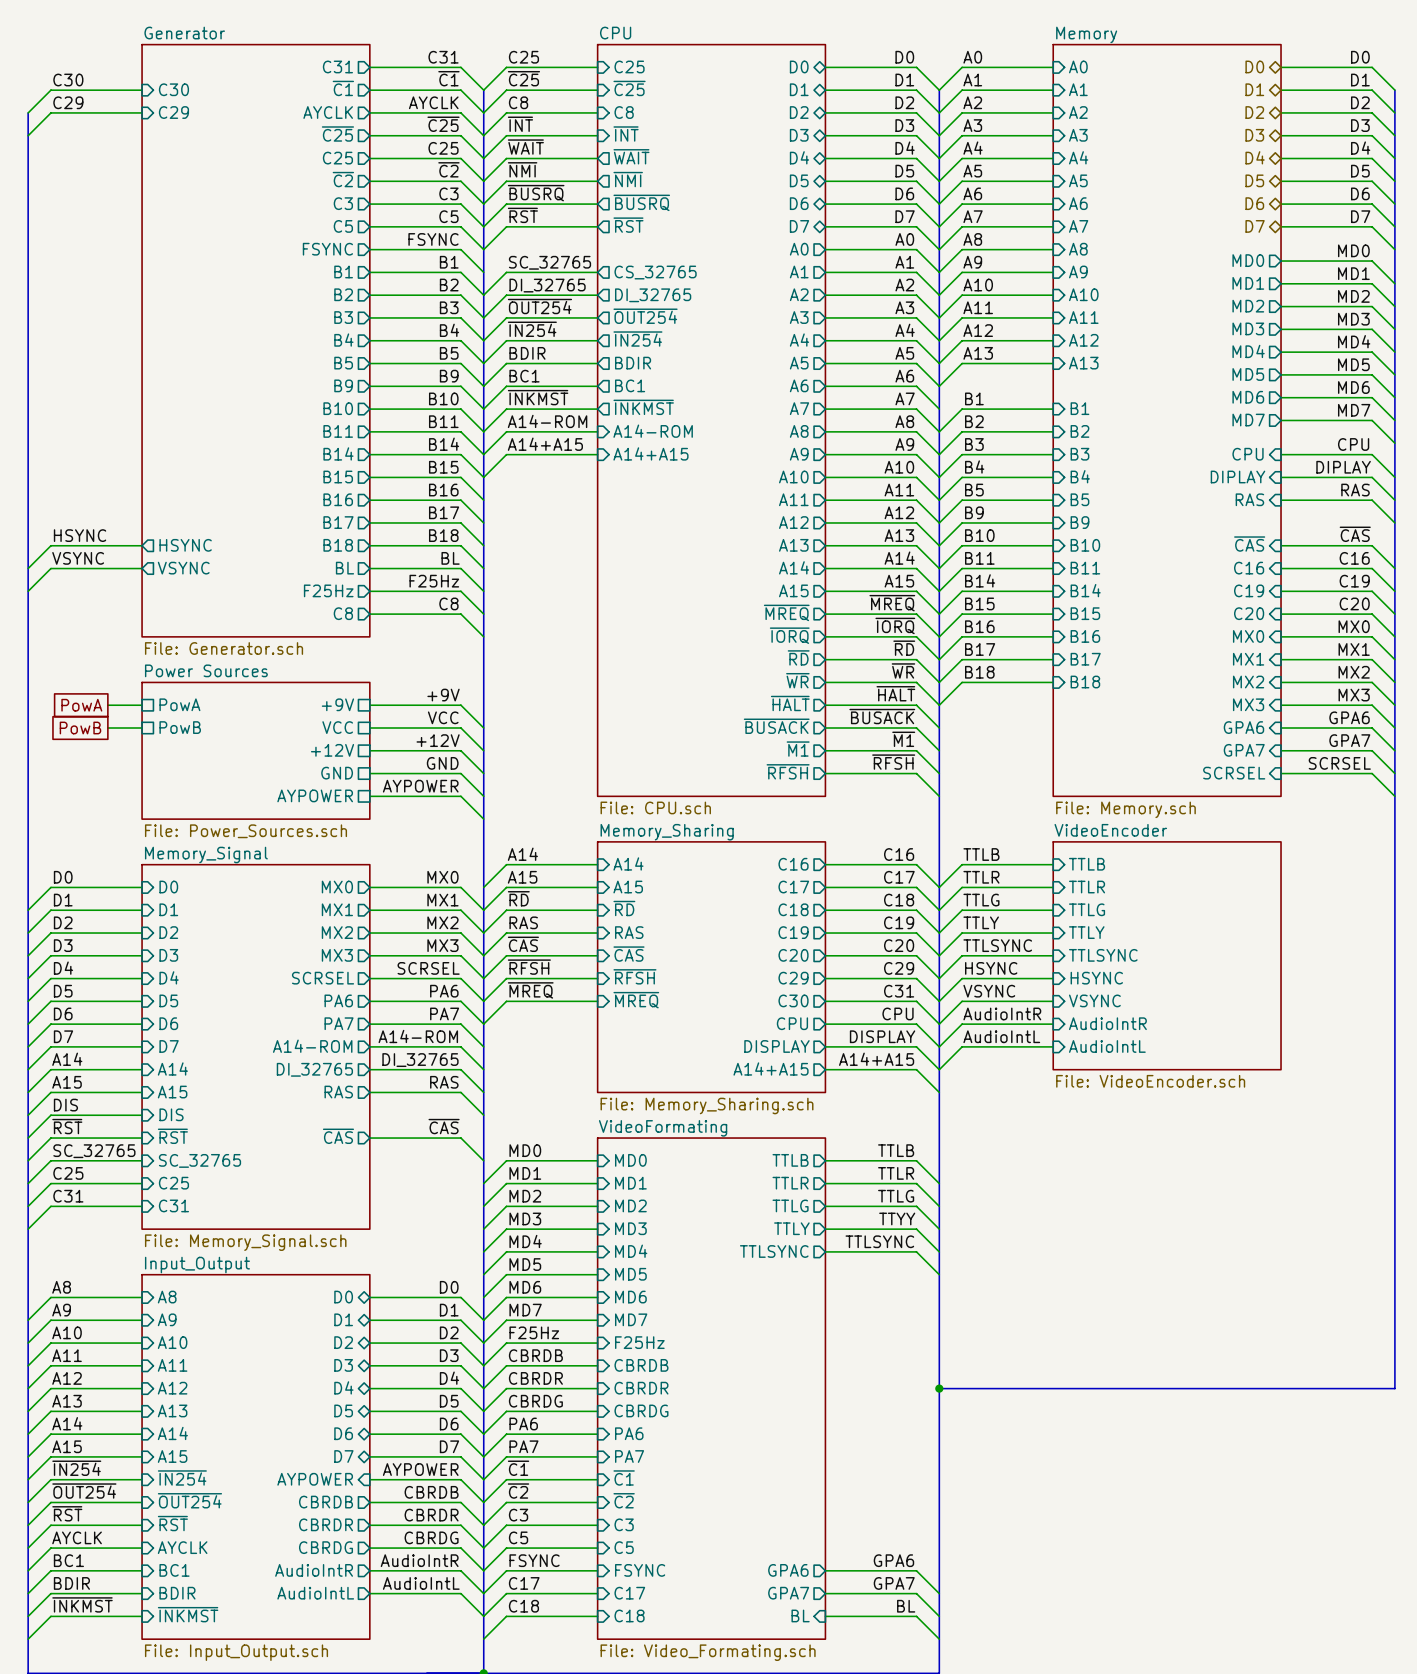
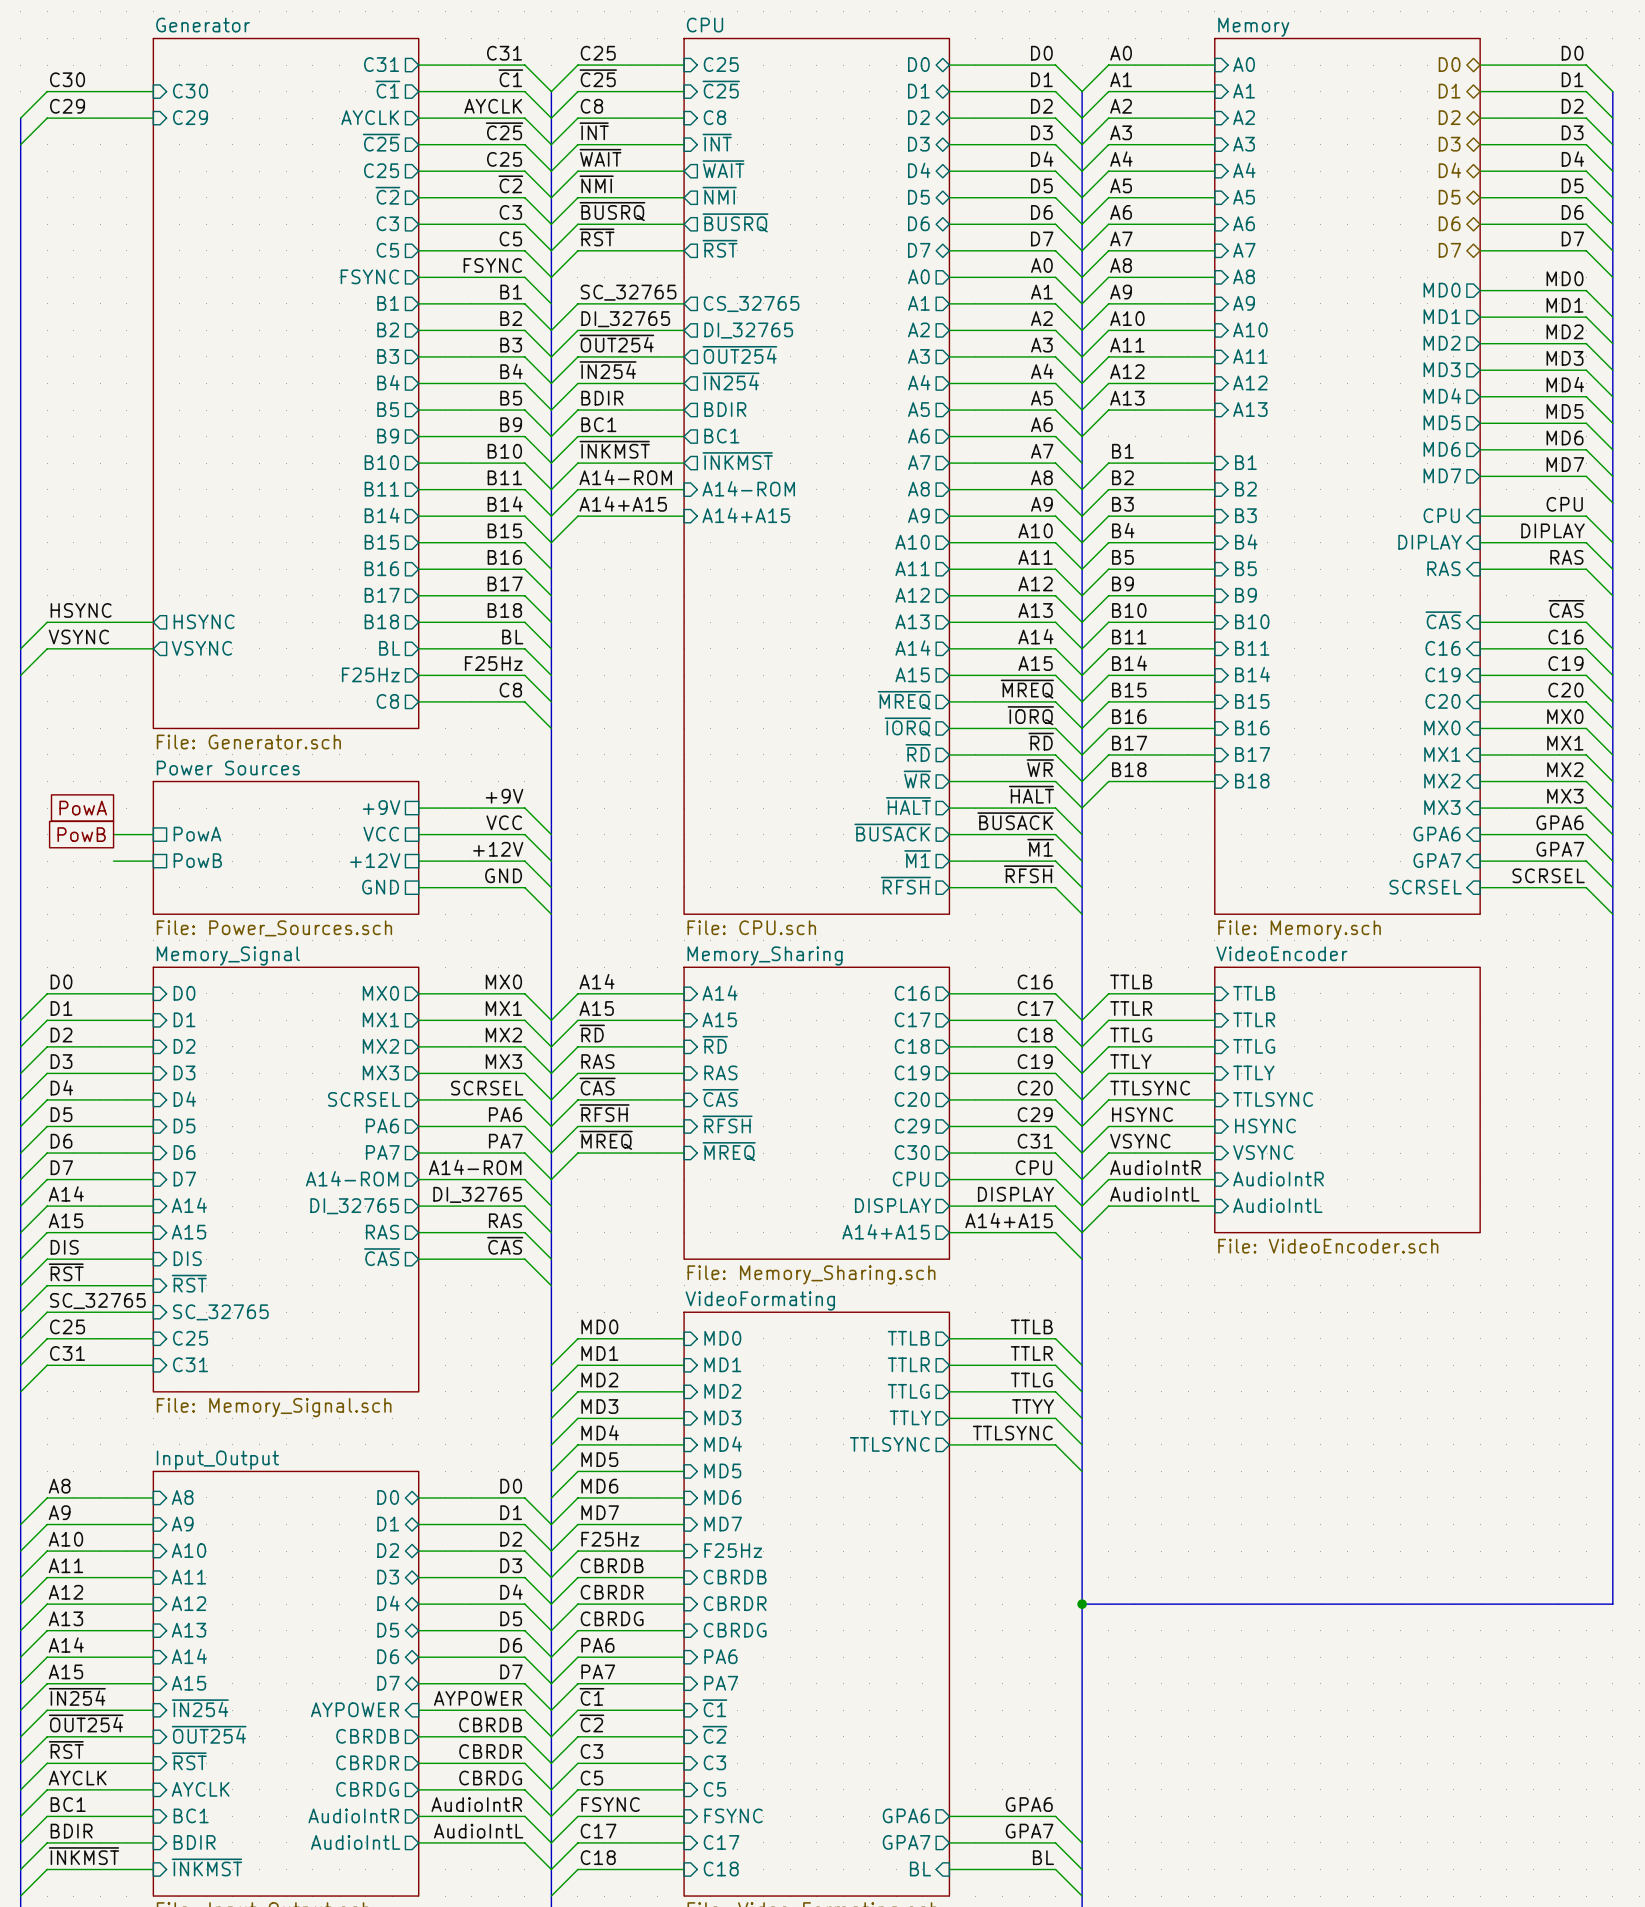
sheet pin: PowA (179, 704) -> none
wire: (107, 705) (142, 705) -> (113, 861) (153, 861)
sheet pin: PowB (180, 727) -> PowA (197, 834)
sheet Power Sources: none -> File: Power_Sources.sch (286, 847)
sheet pin: none -> PowB (197, 860)
sheet Power Sources: File: Power_Sources.sch (255, 750) -> none
label: AYPOWER (420, 786) -> none
sheet pin: AYPOWER (315, 795) -> none
wire: (369, 796) (460, 796) (483, 819) -> (418, 993) (524, 993) (551, 1020)
label: none -> D0 (61, 981)
label: none -> MX0 (503, 981)
wire: none -> (153, 993) (47, 993) (20, 1020)
sheet pin: none -> D0 (184, 993)
sheet pin: none -> MX0 (380, 993)
label: D0 (63, 877) -> D1 (61, 1008)
label: MX0 (442, 877) -> MX1 (503, 1008)
sheet pin: D0 (168, 887) -> D1 (184, 1019)
sheet pin: MX0 (337, 887) -> MX1 (380, 1019)
label: D1 (63, 900) -> D2 (61, 1035)
label: MX1 (442, 900) -> MX2 (503, 1035)
sheet pin: D1 (168, 909) -> D2 (184, 1046)
sheet pin: MX1 (337, 909) -> MX2 (380, 1046)
label: D2 (63, 922) -> D3 (61, 1061)
label: MX2 (442, 922) -> MX3 (503, 1061)
sheet pin: D2 (168, 932) -> D3 (184, 1072)
sheet pin: MX2 (337, 932) -> MX3 (380, 1072)
label: D3 (63, 945) -> D4 (61, 1087)
label: MX3 (442, 945) -> SCRSEL (487, 1088)
sheet pin: D3 (168, 955) -> D4 (184, 1099)
sheet pin: MX3 (337, 955) -> SCRSEL (364, 1099)
label: D4 (63, 968) -> D5 (61, 1114)
label: SCRSEL (428, 968) -> PA6 (505, 1114)
sheet pin: D4 (169, 977) -> D5 (184, 1125)
sheet pin: SCRSEL (323, 978) -> PA6 (382, 1125)
label: D5 (63, 991) -> D6 (61, 1141)
label: PA6 (444, 991) -> PA7 (505, 1141)
sheet pin: D5 (168, 1000) -> D6 (184, 1152)
sheet pin: PA6 (338, 1000) -> PA7 (382, 1152)
label: D6 (63, 1013) -> D7 (61, 1167)
label: PA7 (444, 1013) -> A14-ROM (475, 1167)
sheet pin: D6 (168, 1023) -> D7 (184, 1179)
sheet pin: PA7 (339, 1023) -> A14-ROM (352, 1178)
label: D7 (63, 1036) -> A14 (66, 1193)
label: A14-ROM (418, 1036) -> DI_32765 (477, 1194)
sheet pin: D7 (169, 1046) -> A14 (189, 1205)
sheet Memory_Signal position: (255, 1046) -> (286, 1179)
sheet pin: A14-ROM (312, 1046) -> DI_32765 (354, 1206)
label: A14 (67, 1059) -> A15 (65, 1220)
label: DI_32765 (420, 1060) -> RAS (505, 1220)
sheet pin: A14 (172, 1068) -> A15 (188, 1232)
sheet pin: DI_32765 (314, 1069) -> RAS (382, 1232)
label: A15 (67, 1082) -> DIS (64, 1247)
label: RAS (444, 1082) -> ~{CAS} (505, 1245)
sheet pin: A15 (172, 1092) -> DIS (187, 1258)
sheet pin: RAS (338, 1092) -> ~{CAS} (382, 1257)
label: DIS (65, 1105) -> ~{RST} (66, 1272)
sheet pin: DIS (171, 1114) -> ~{RST} (189, 1283)
label: ~{RST} (67, 1126) -> SC_32765 (97, 1301)
label: ~{CAS} (444, 1126) -> none
sheet pin: ~{RST} (172, 1136) -> SC_32765 (220, 1312)
sheet pin: ~{CAS} (338, 1136) -> none
wire: (369, 1138) (460, 1138) (483, 1160) -> none
label: SC_32765 (94, 1151) -> C25 (67, 1326)
sheet pin: SC_32765 (199, 1160) -> C25 (190, 1338)
label: C25 (68, 1173) -> C31 (67, 1353)
sheet pin: C25 (173, 1183) -> C31 (190, 1364)
label: C31 (68, 1196) -> none
sheet pin: C31 (173, 1205) -> none
wire: (142, 1206) (50, 1206) (28, 1229) -> none

